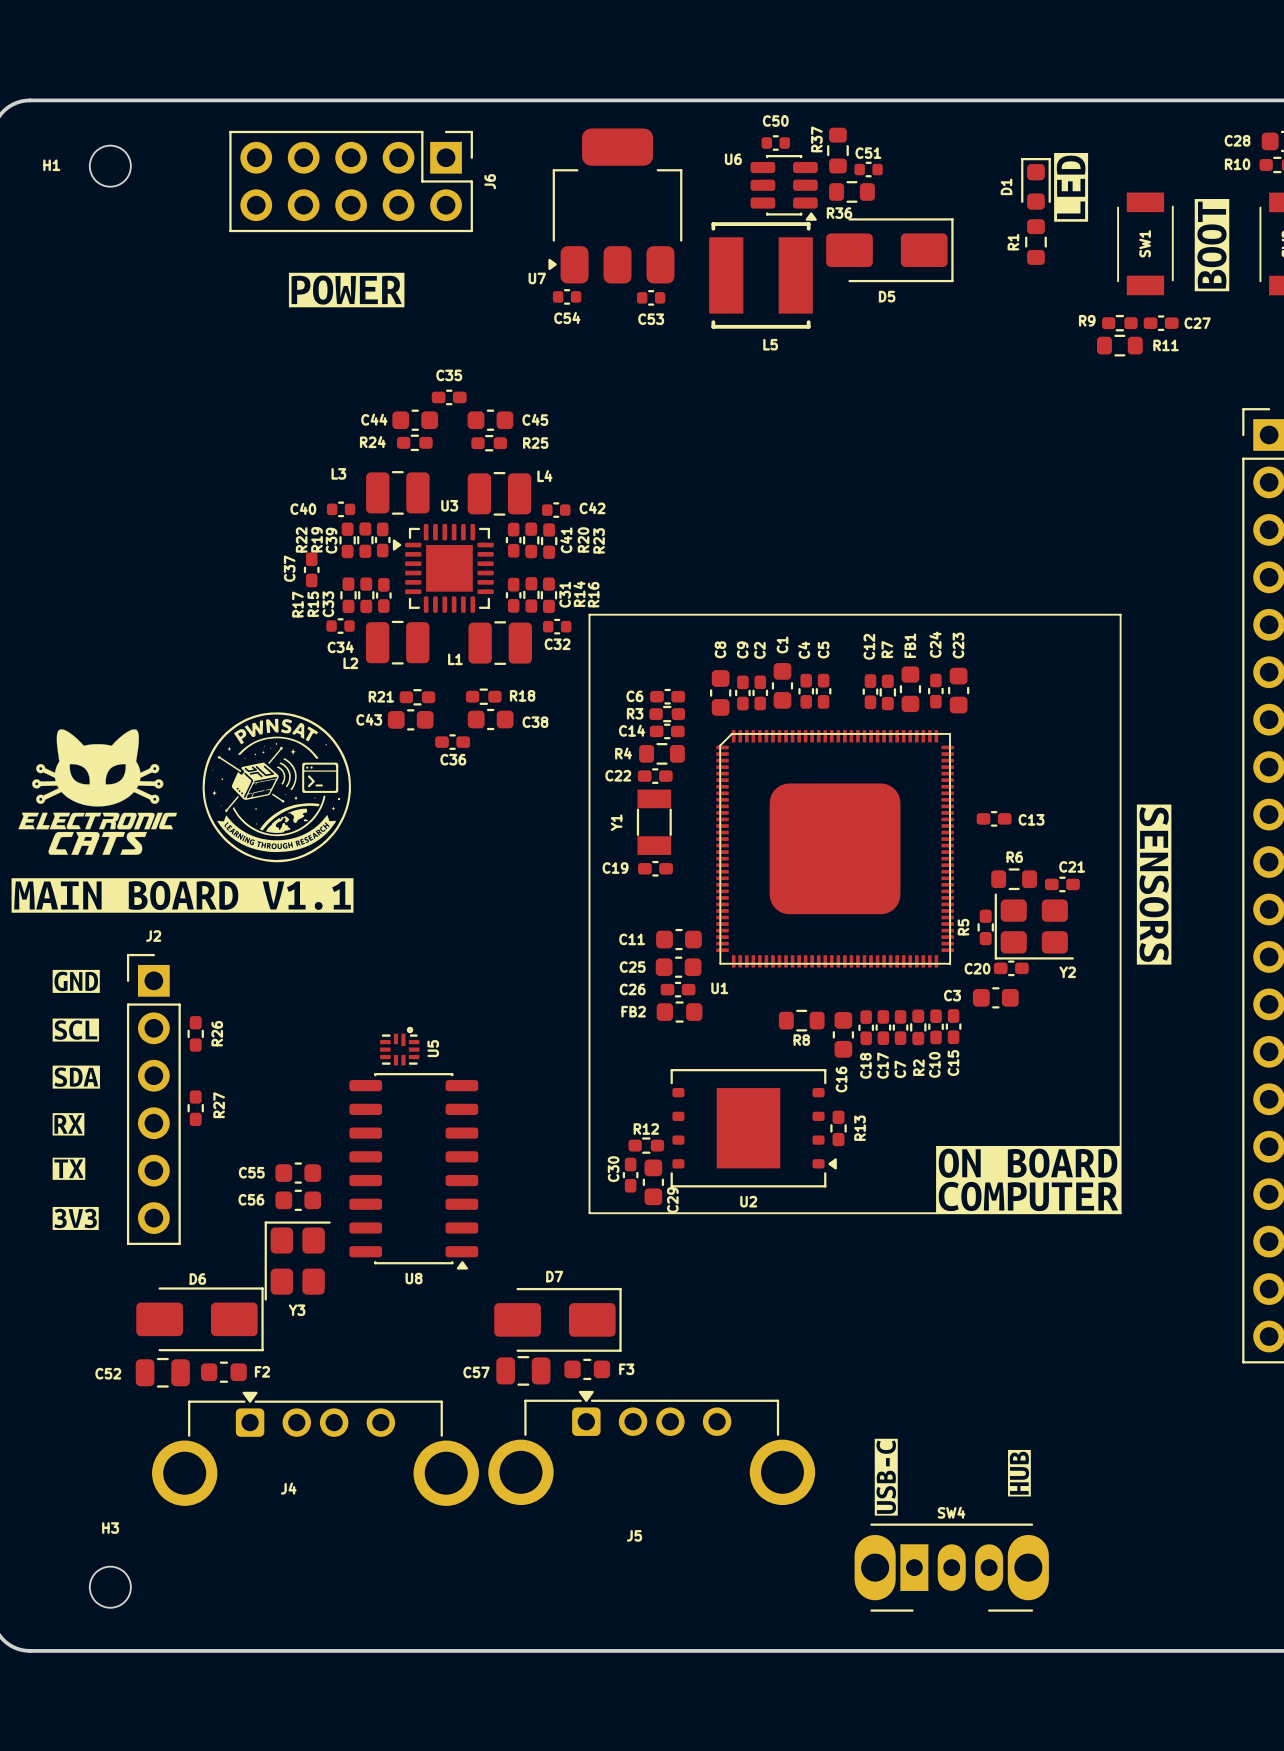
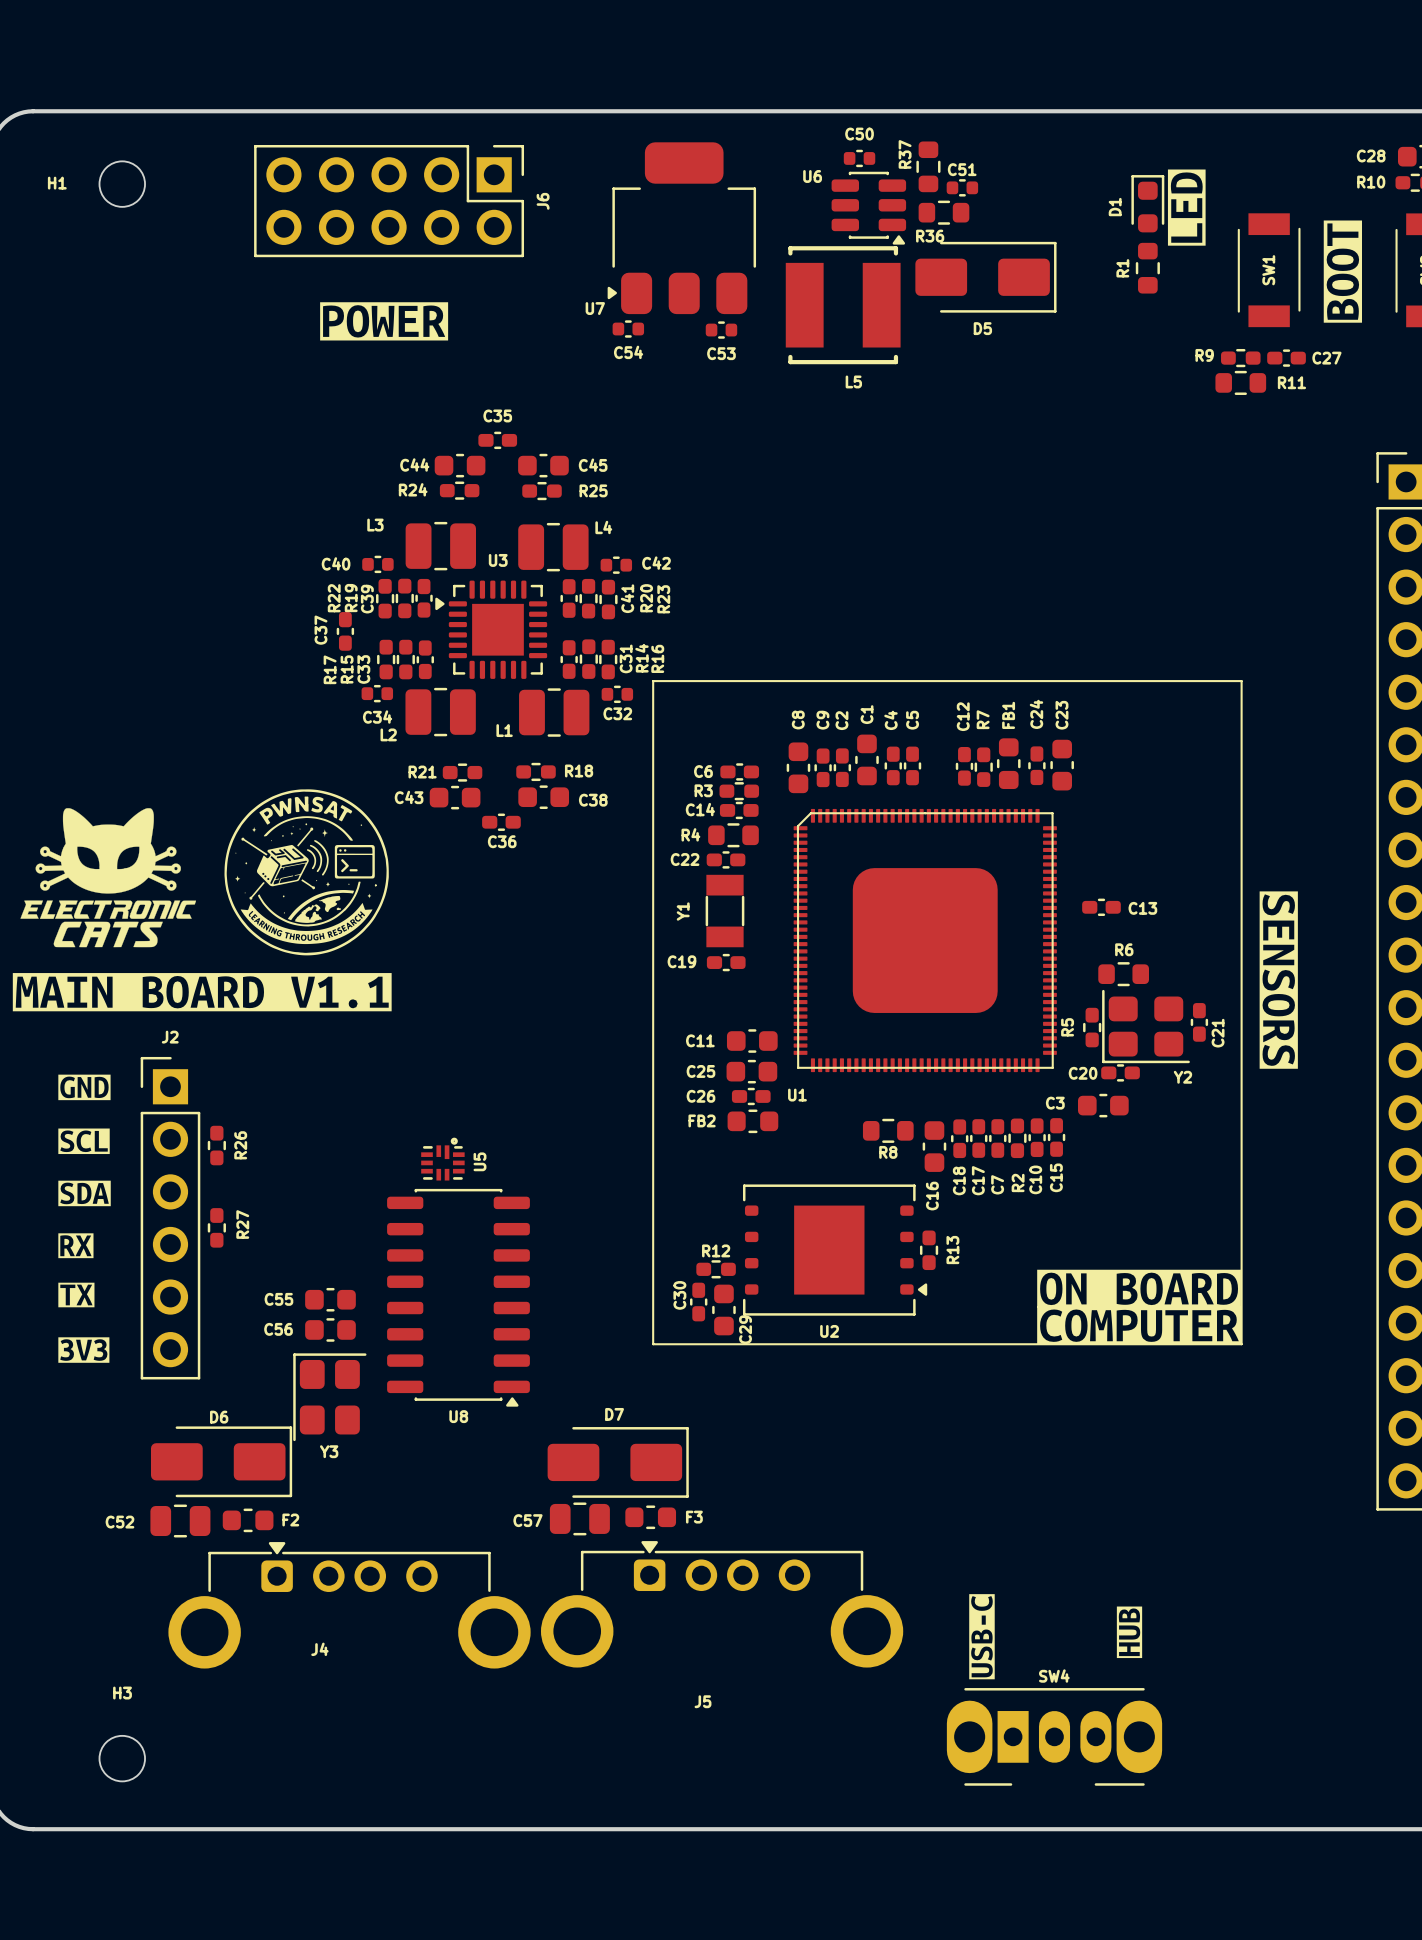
C21 rotation: 0° (1062, 884) -> 90° clockwise (1199, 1022)
C21 position: (1062, 884) -> (1199, 1022)

